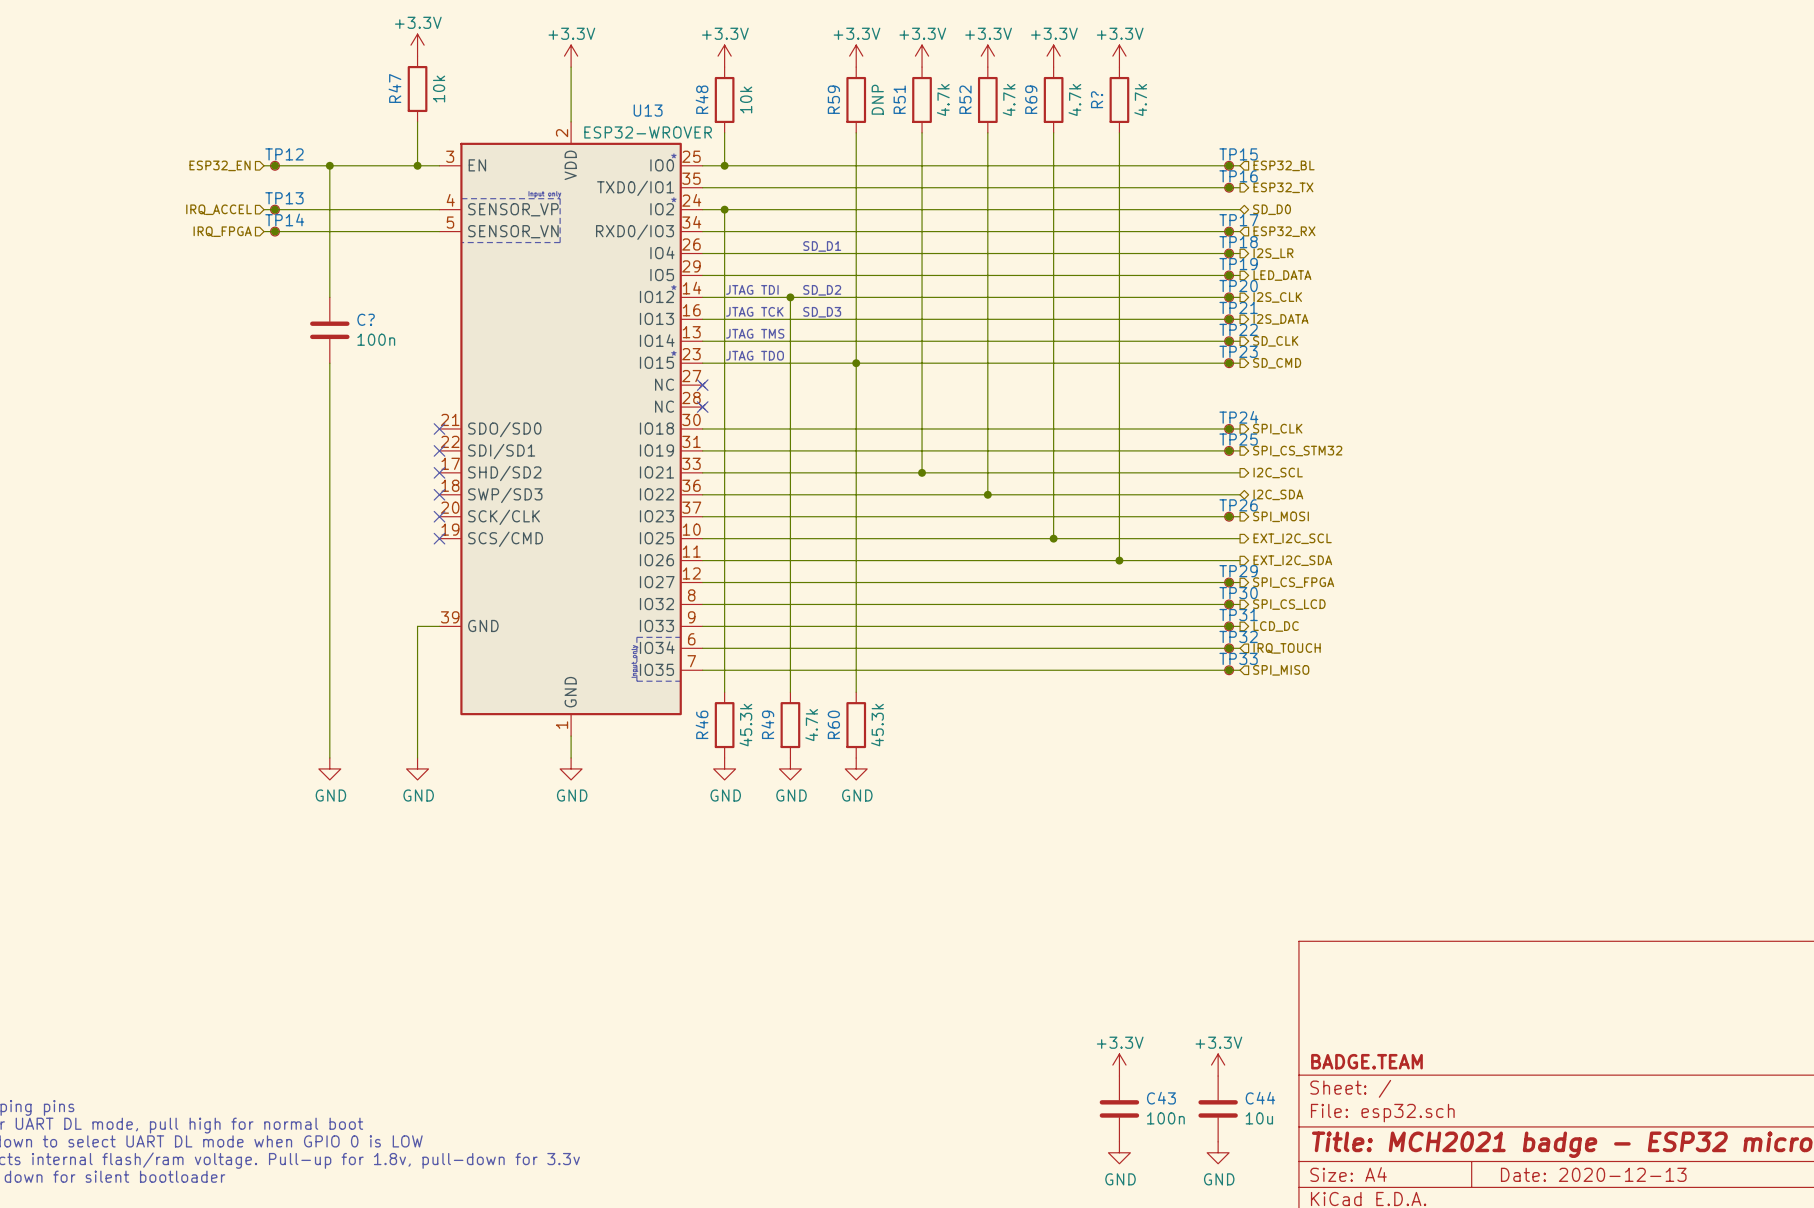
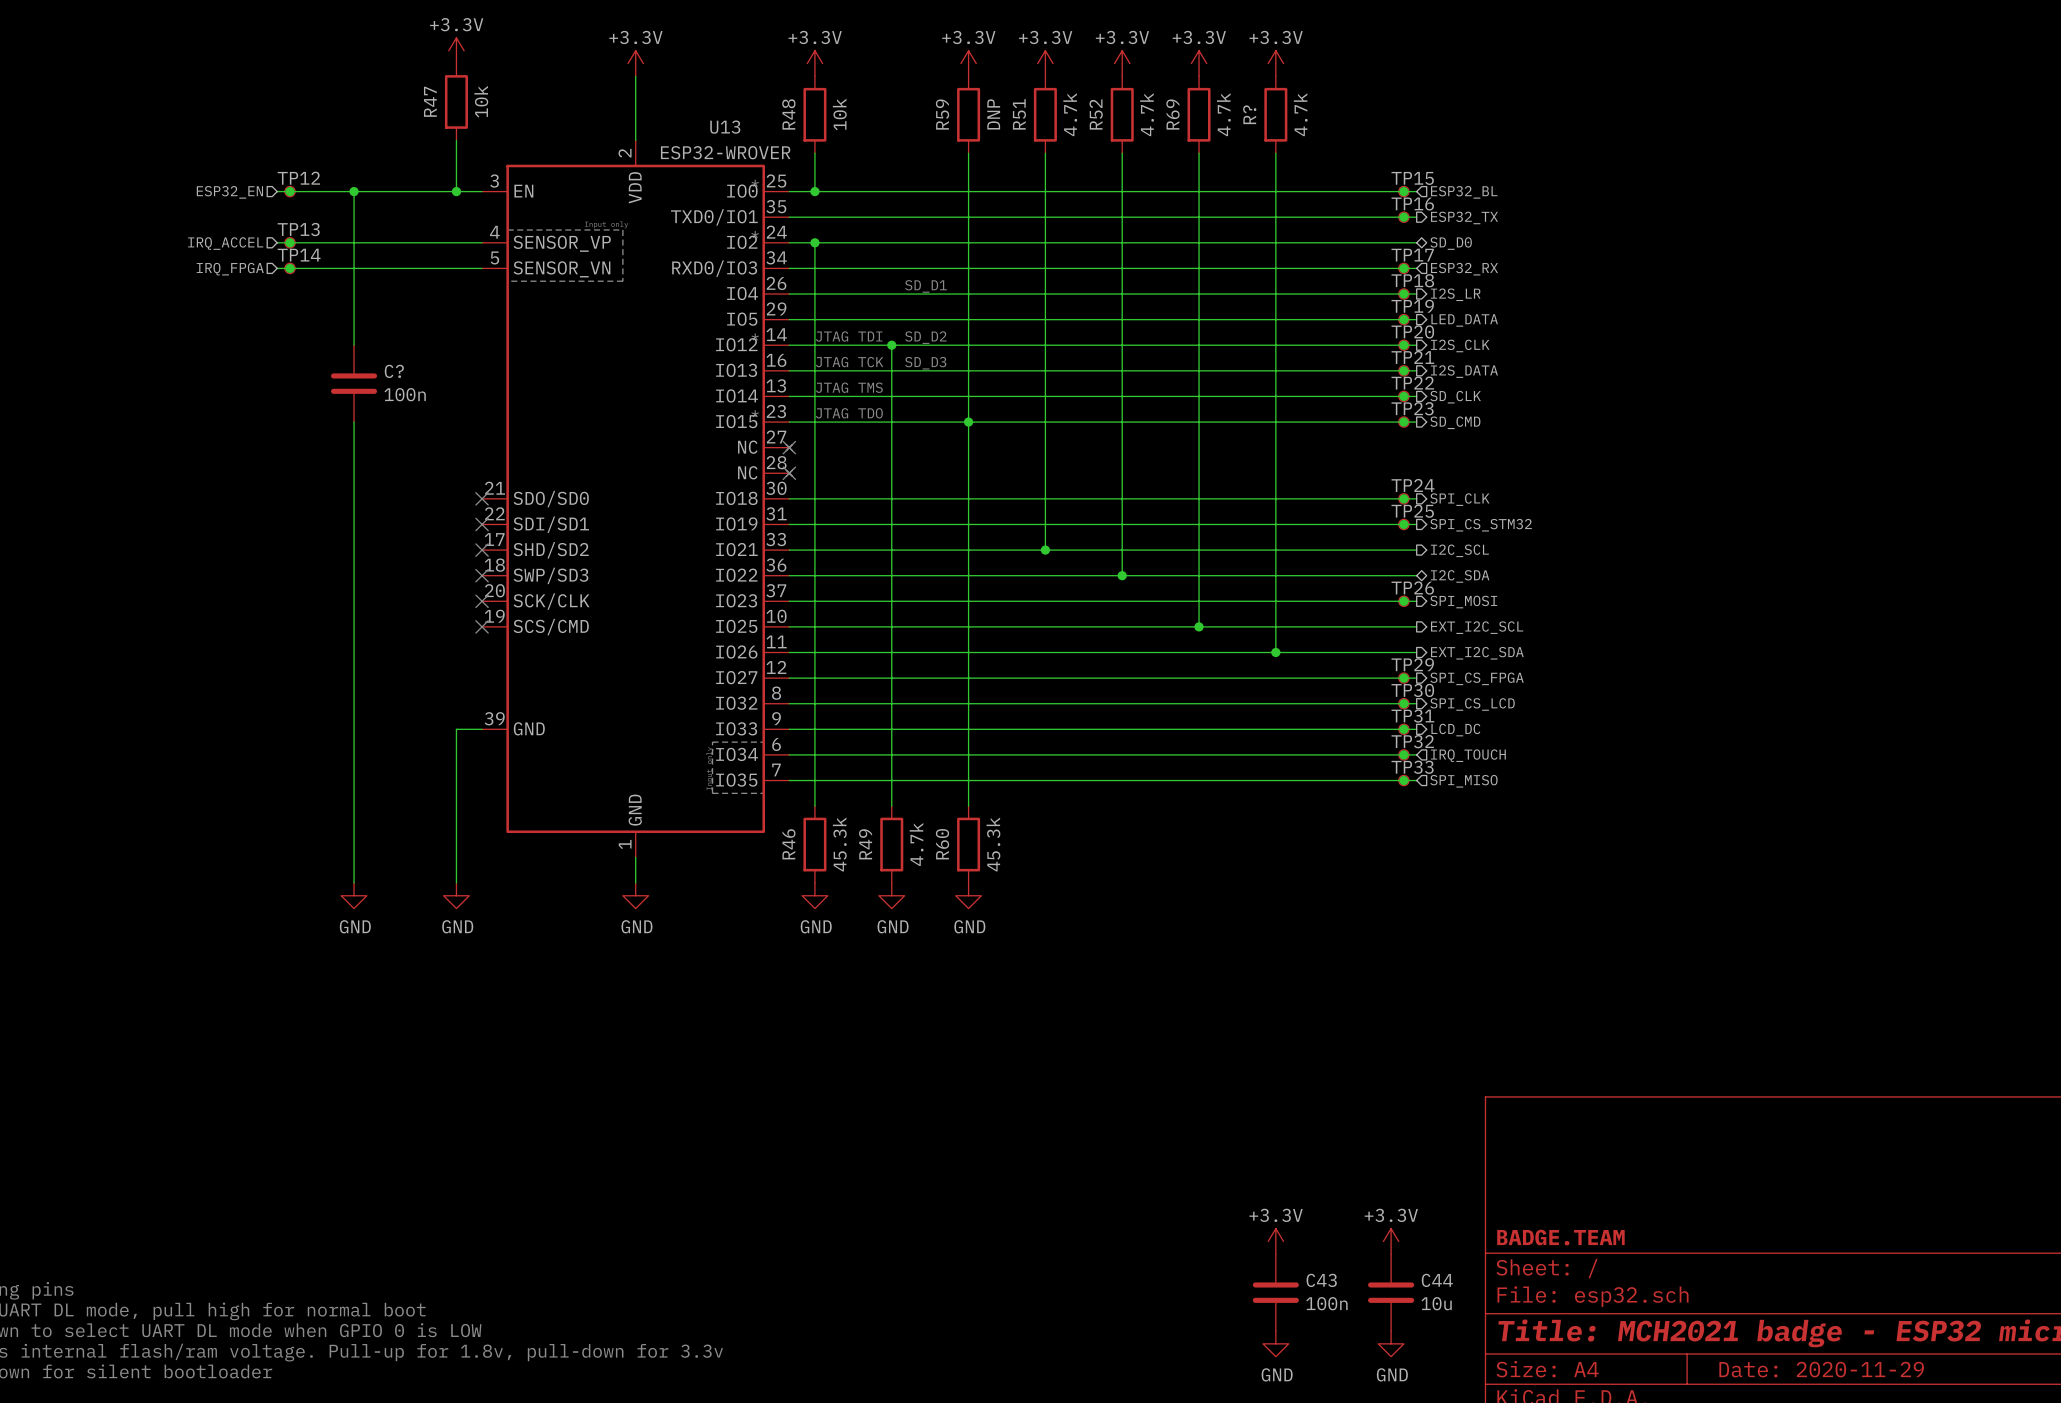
title block: Date: 2020-12-13 (1593, 1174) -> Date: 2020-11-29 (1821, 1369)

